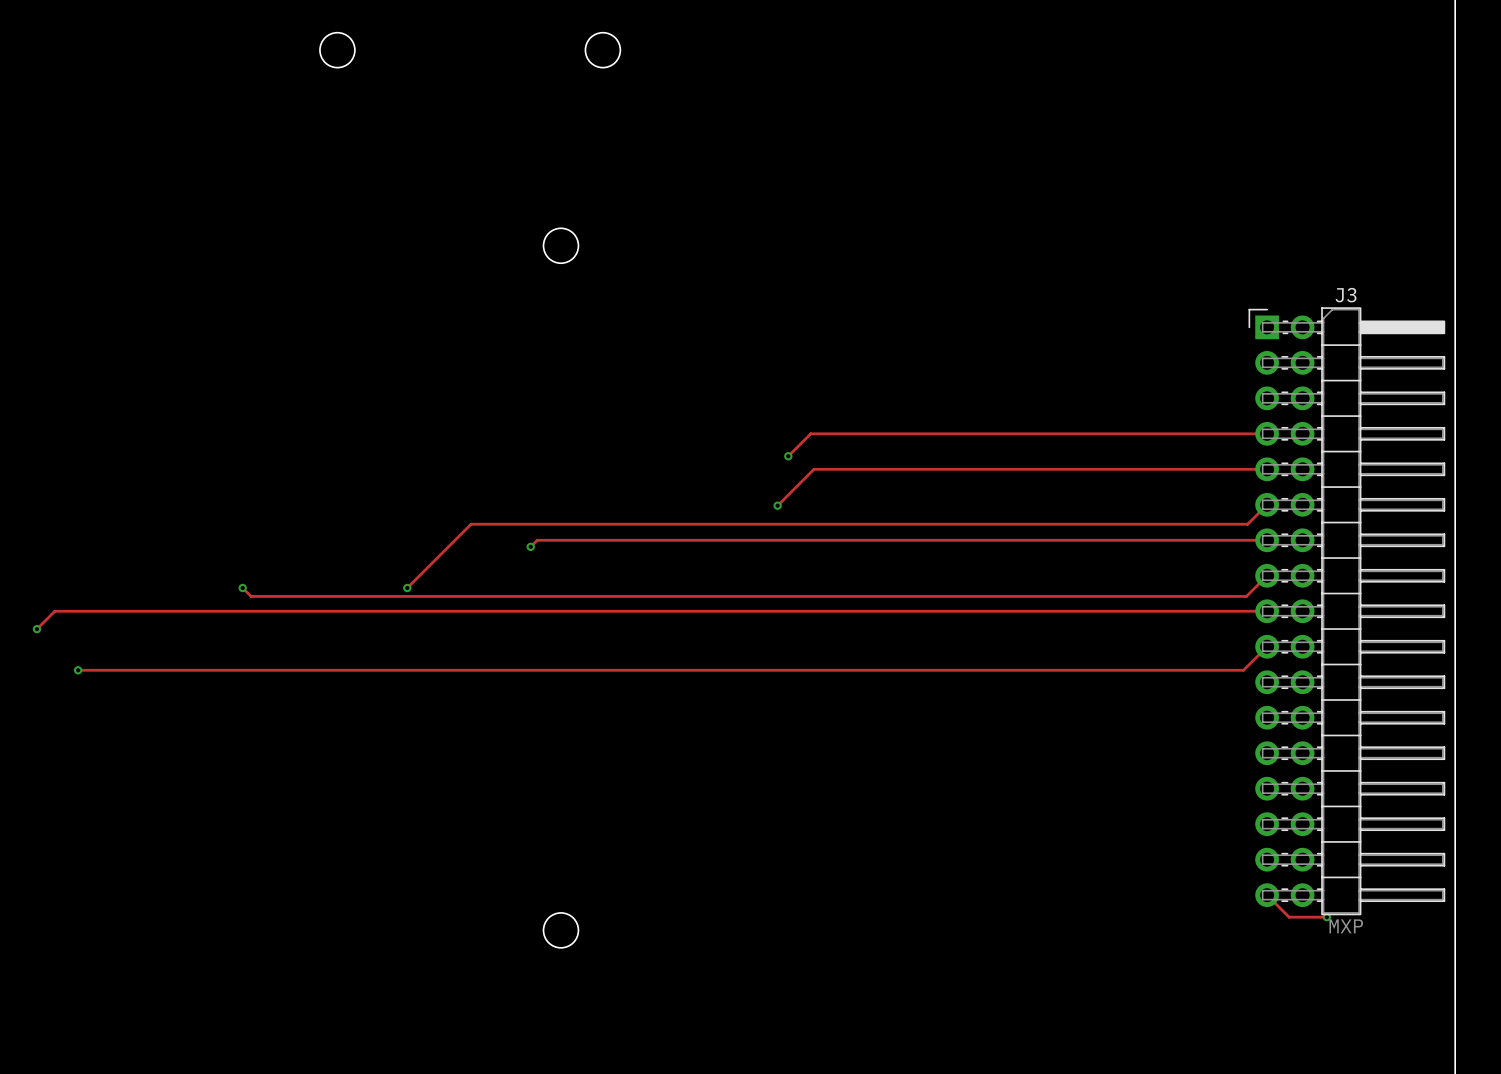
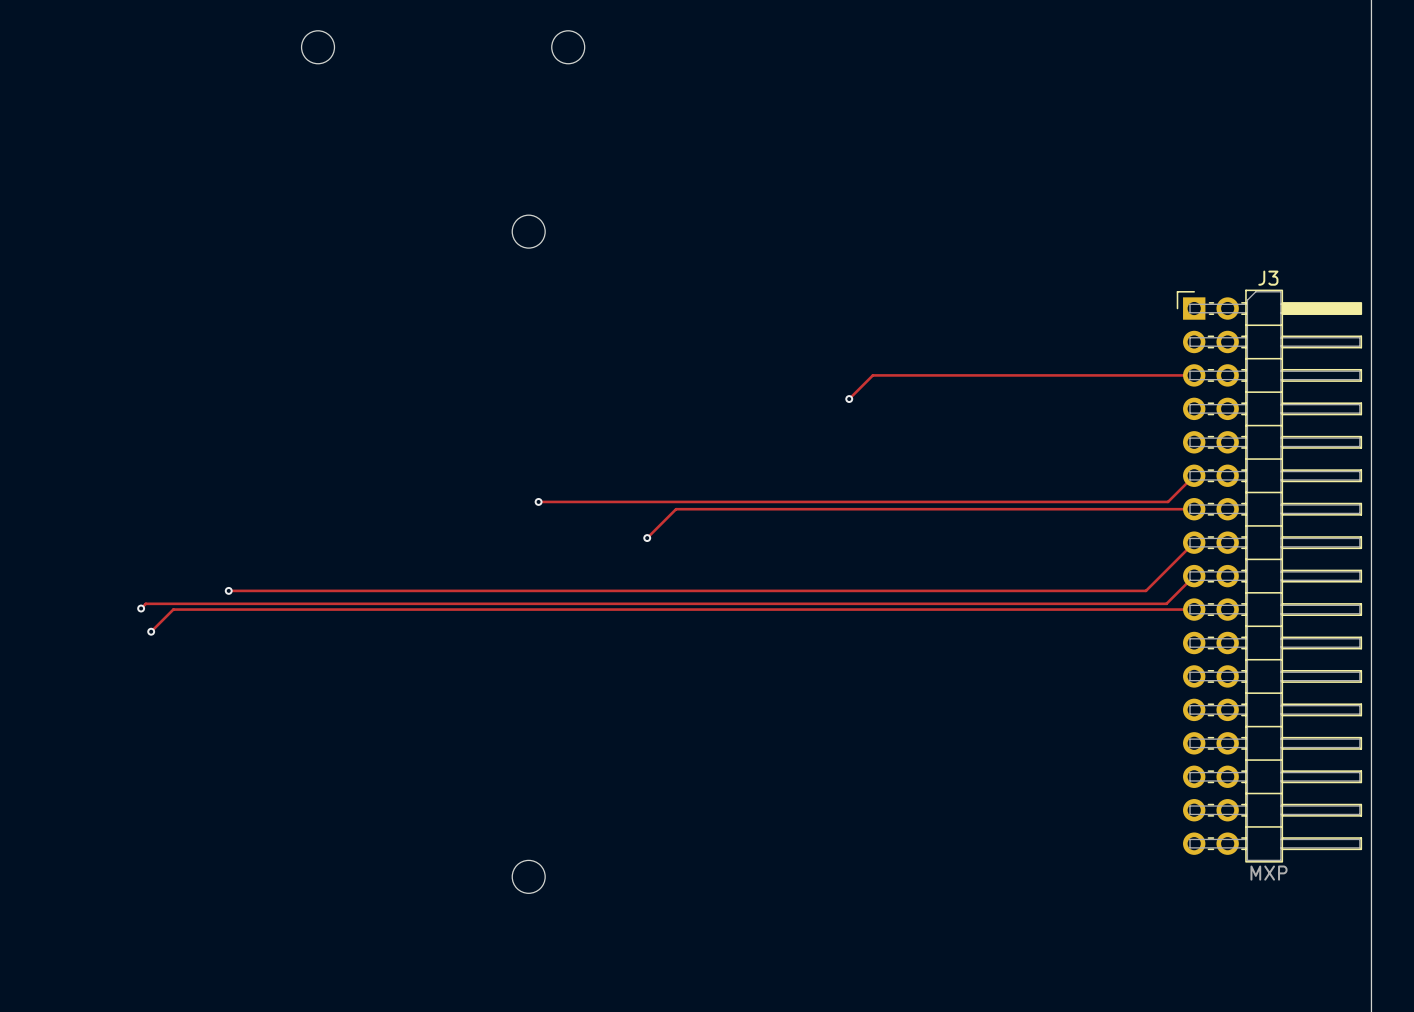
track: none -> (1194, 375) (872, 375) (849, 399)
via: none -> (849, 399)
track: (1267, 433) (810, 433) (788, 456) -> none
via: (788, 456) -> none
track: (1267, 469) (814, 469) (777, 505) -> none
via: (777, 505) -> none
track: (1247, 524) (471, 524) (407, 587) -> (1175, 494) (1168, 501) (538, 501)
track: (717, 540) (537, 540) (530, 546) -> (676, 509) (647, 538)
via position: (530, 546) -> (538, 501)
via: none -> (647, 538)
track: (242, 587) (251, 596) (1246, 596) -> (228, 590) (1145, 590) (1174, 562)
via position: (242, 587) -> (228, 590)
via: (407, 587) -> none
track: (1267, 611) (54, 611) (36, 629) -> (1194, 576) (1166, 603) (145, 603) (141, 608)
via: (36, 629) -> none
via: none -> (141, 608)
track: (1267, 646) (1243, 670) (78, 670) -> (1194, 609) (173, 609) (151, 631)
via: (78, 670) -> none
via: none -> (151, 631)
track: (1267, 895) (1289, 917) (1326, 917) -> none
via: (1326, 917) -> none

